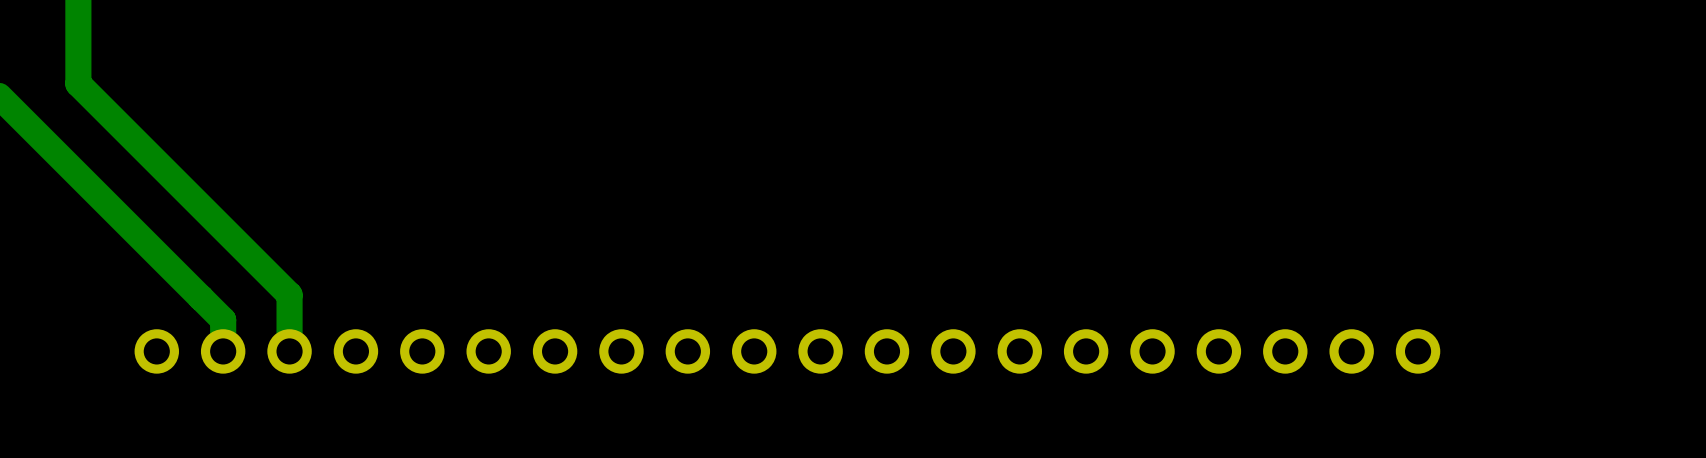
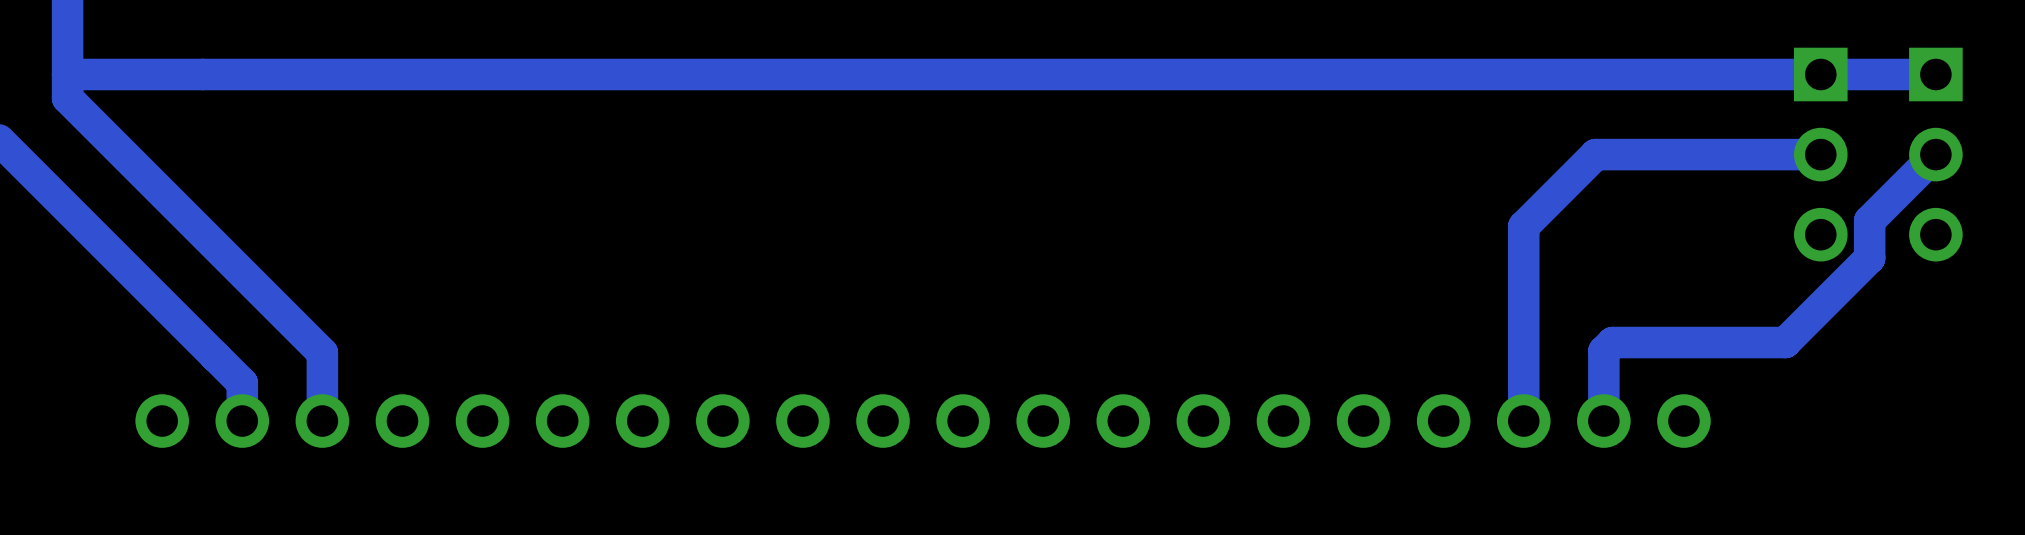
bottom track: none -> (1935, 74) (67, 74)
bottom track: none -> (1820, 154) (1595, 154) (1523, 226) (1523, 421)
part: none -> (1820, 154)
bottom track: none -> (1935, 154) (1869, 220) (1869, 258) (1785, 342) (1612, 342) (1603, 351) (1603, 421)
part: none -> (1935, 154)

